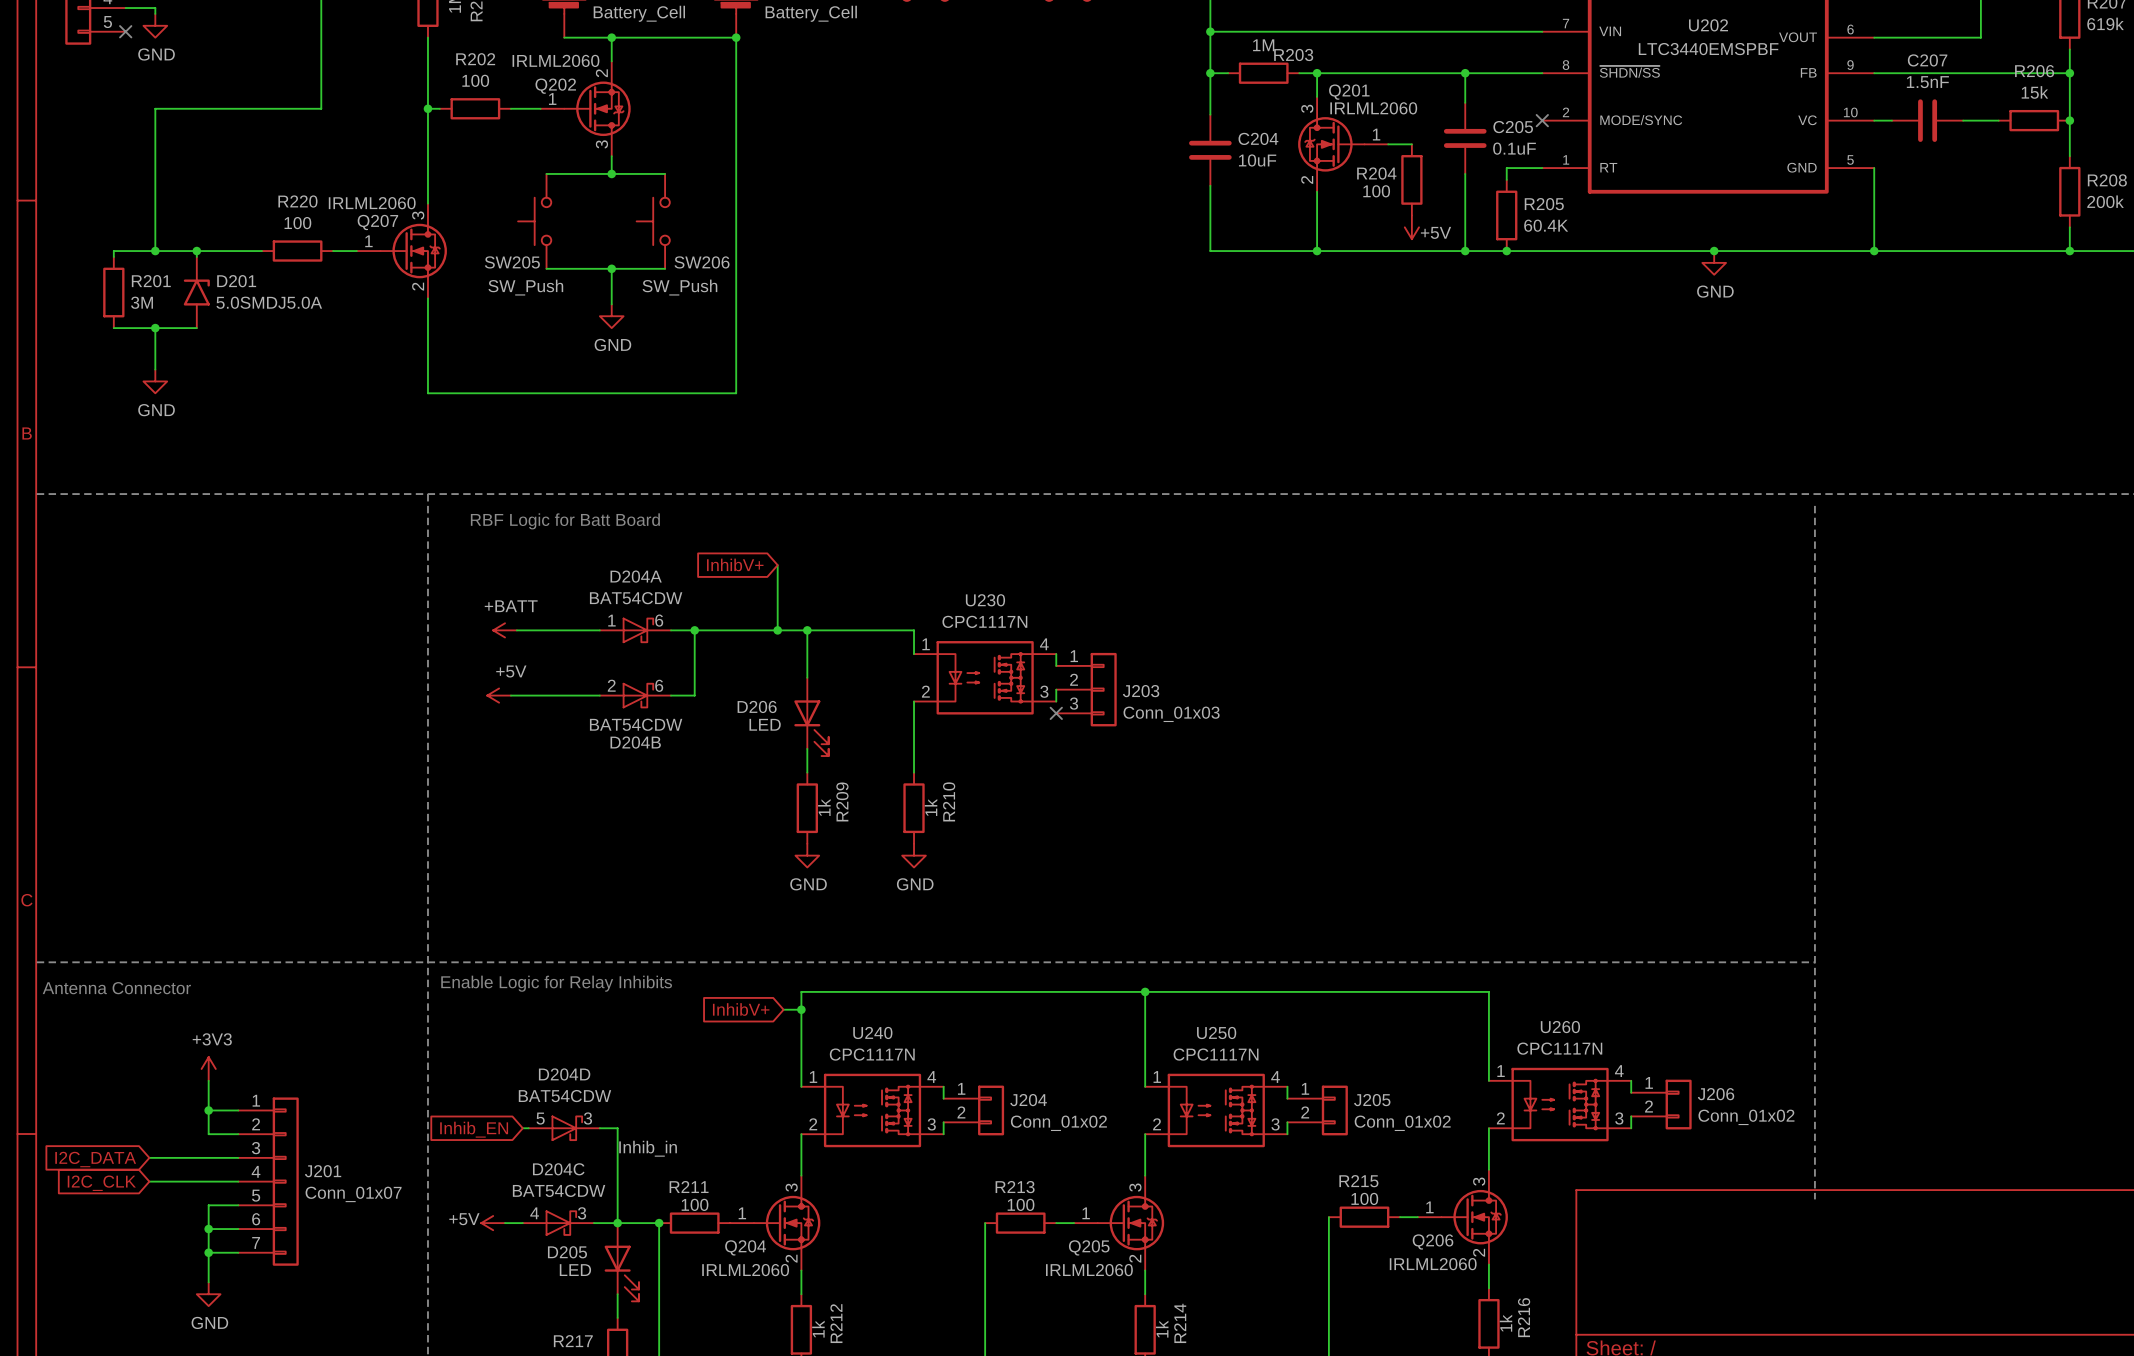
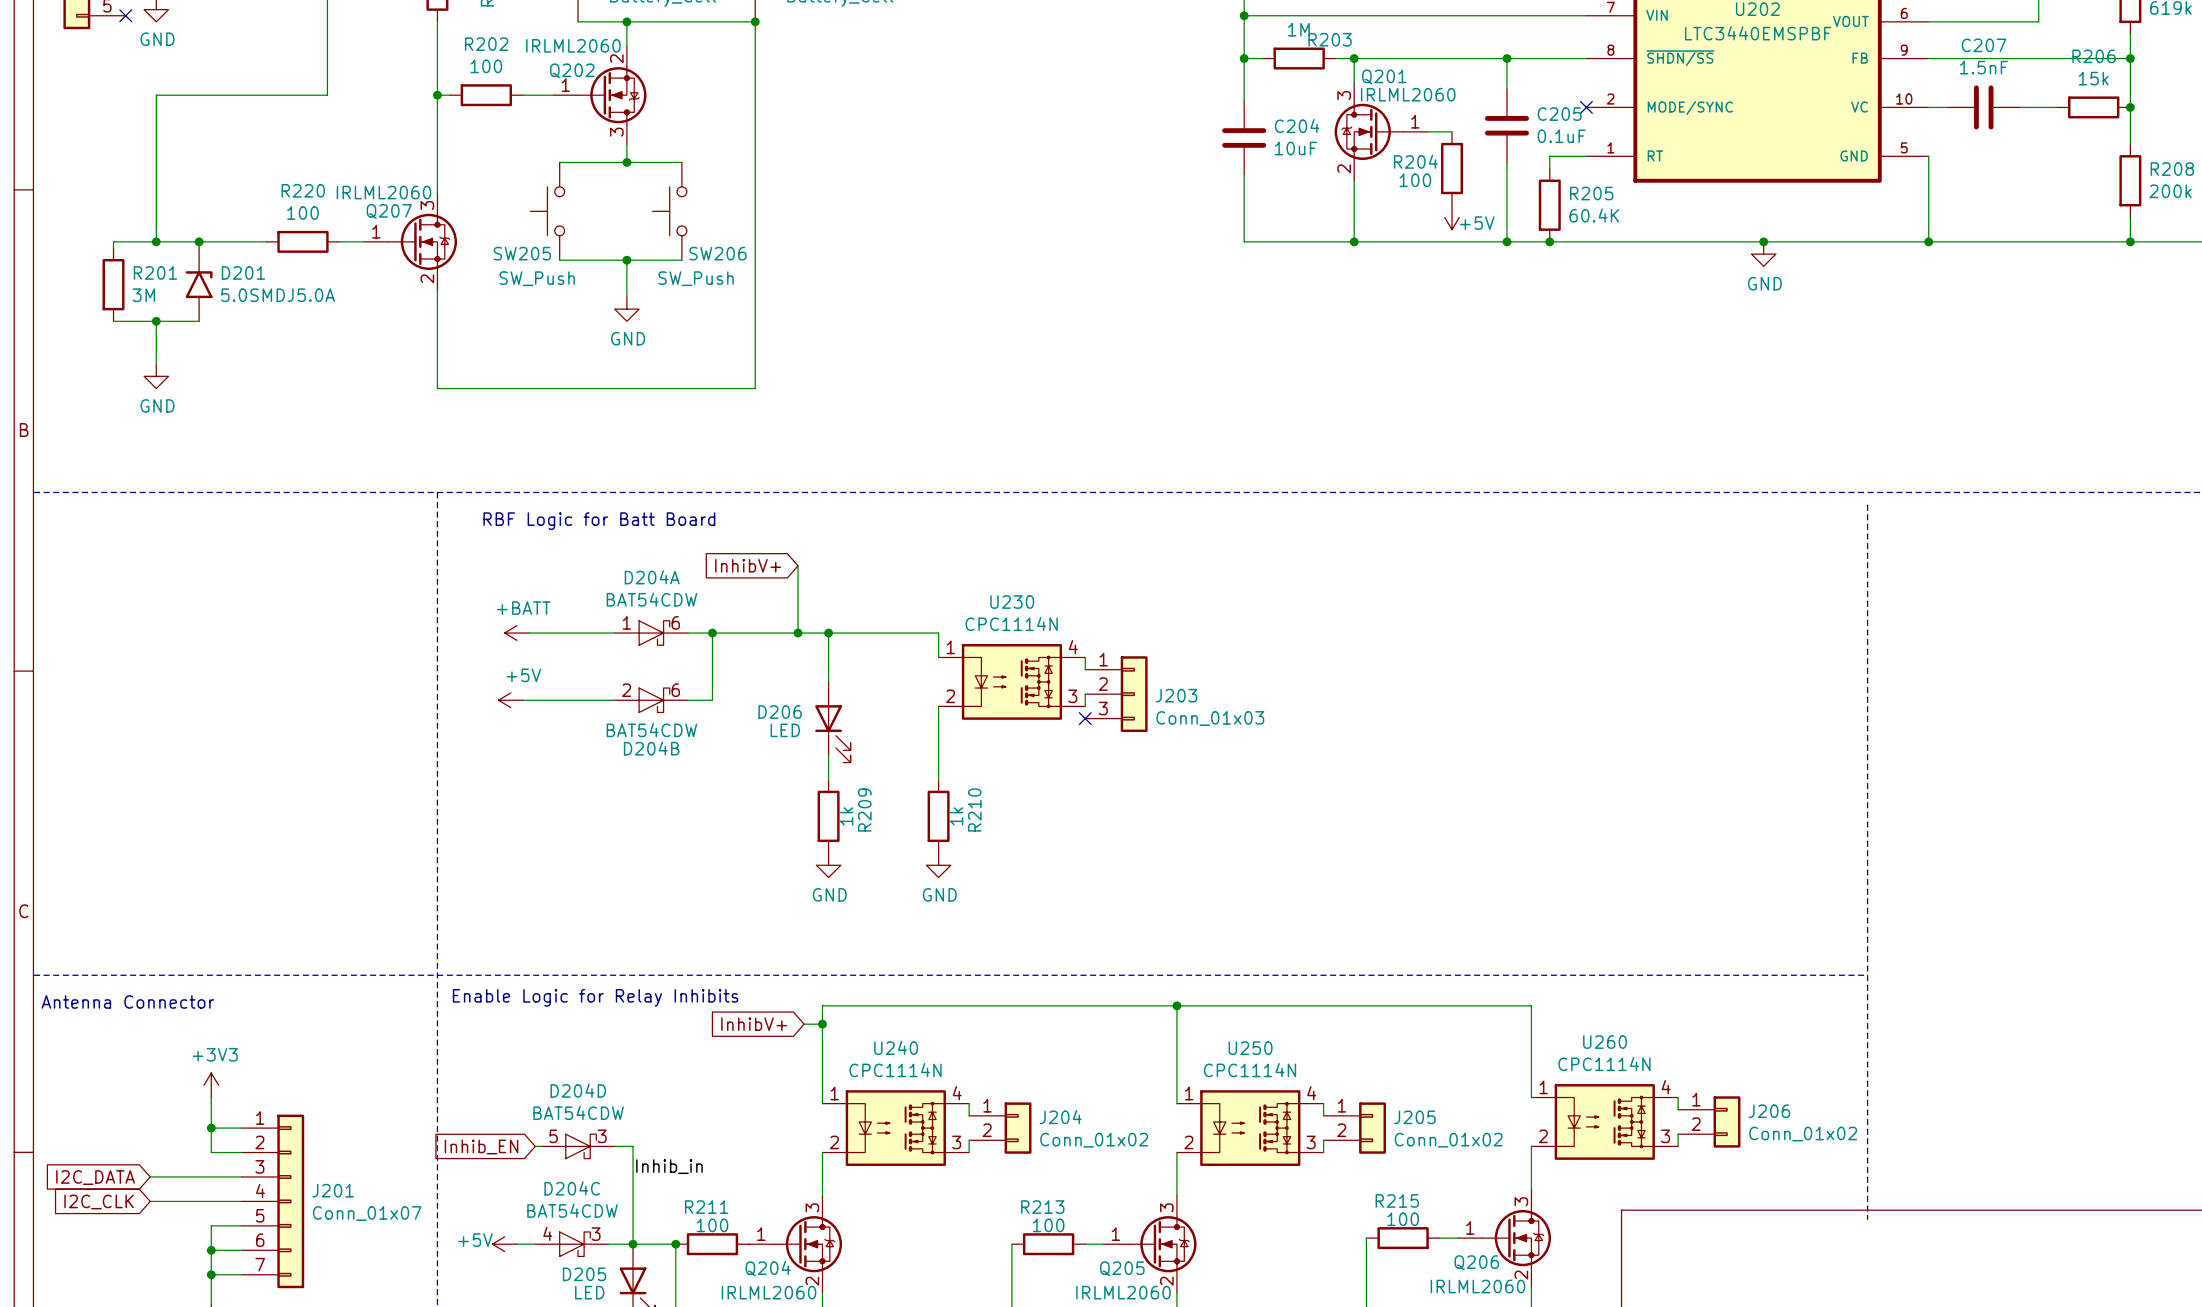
U230 value: CPC1117N (984, 621) -> CPC1114N (1011, 623)
U260 value: CPC1117N (1559, 1048) -> CPC1114N (1604, 1064)
U240 value: CPC1117N (872, 1054) -> CPC1114N (895, 1070)
U250 value: CPC1117N (1216, 1054) -> CPC1114N (1250, 1070)

